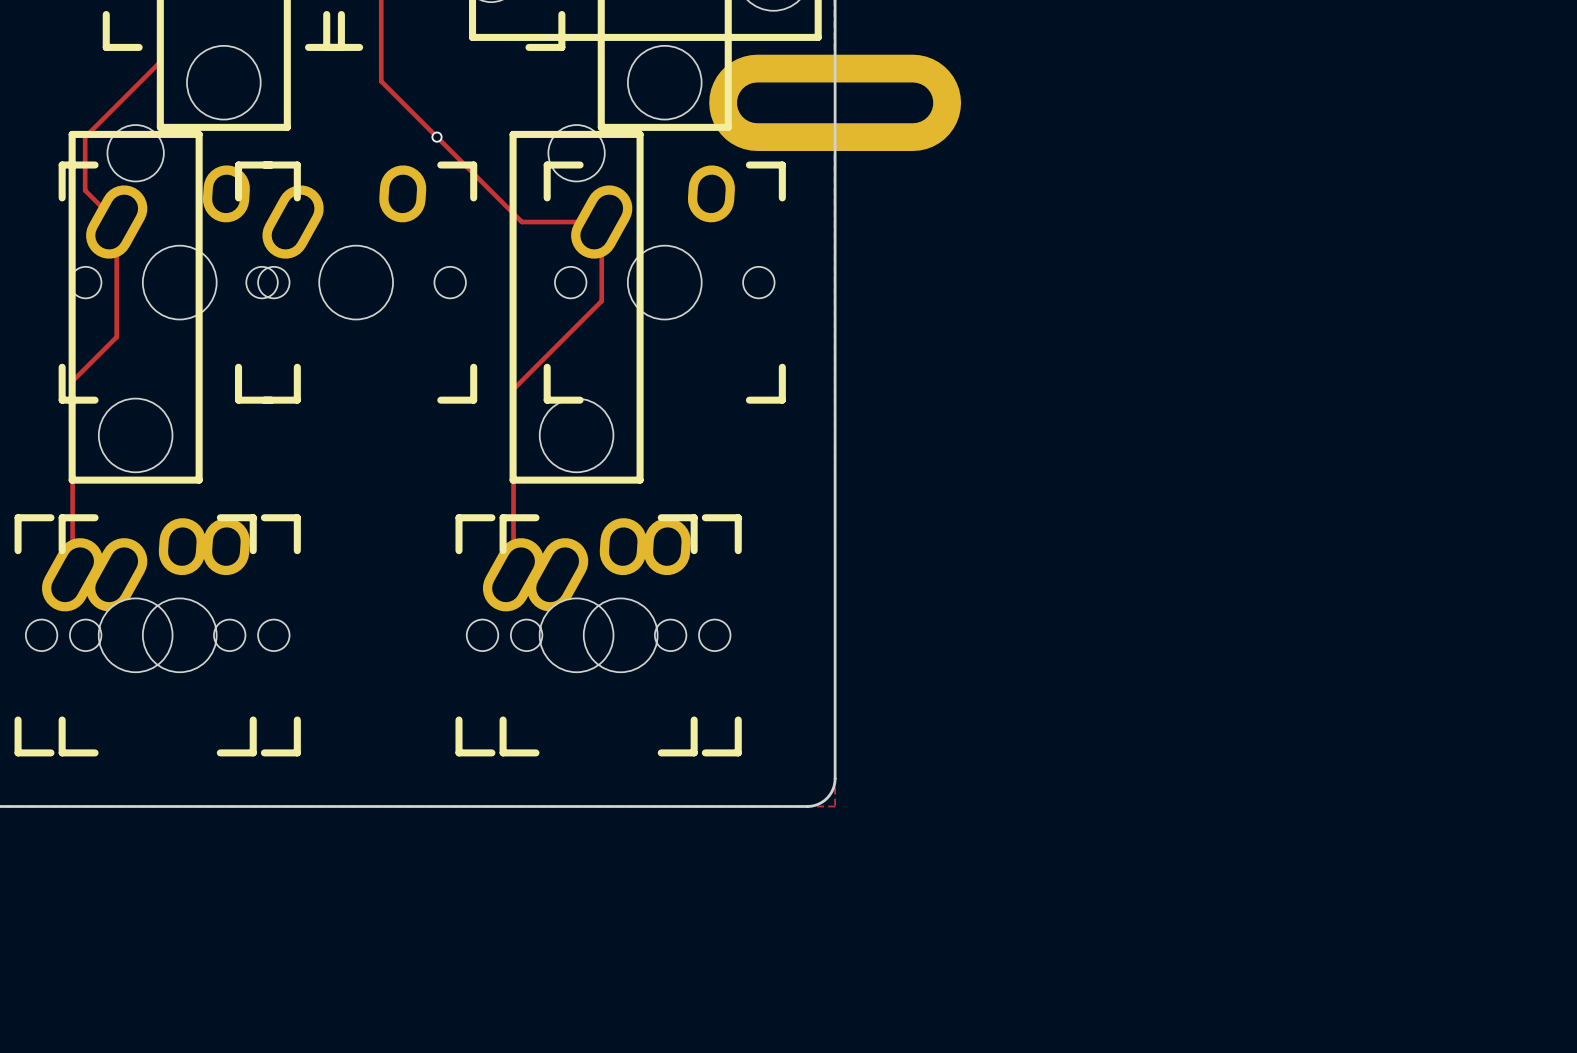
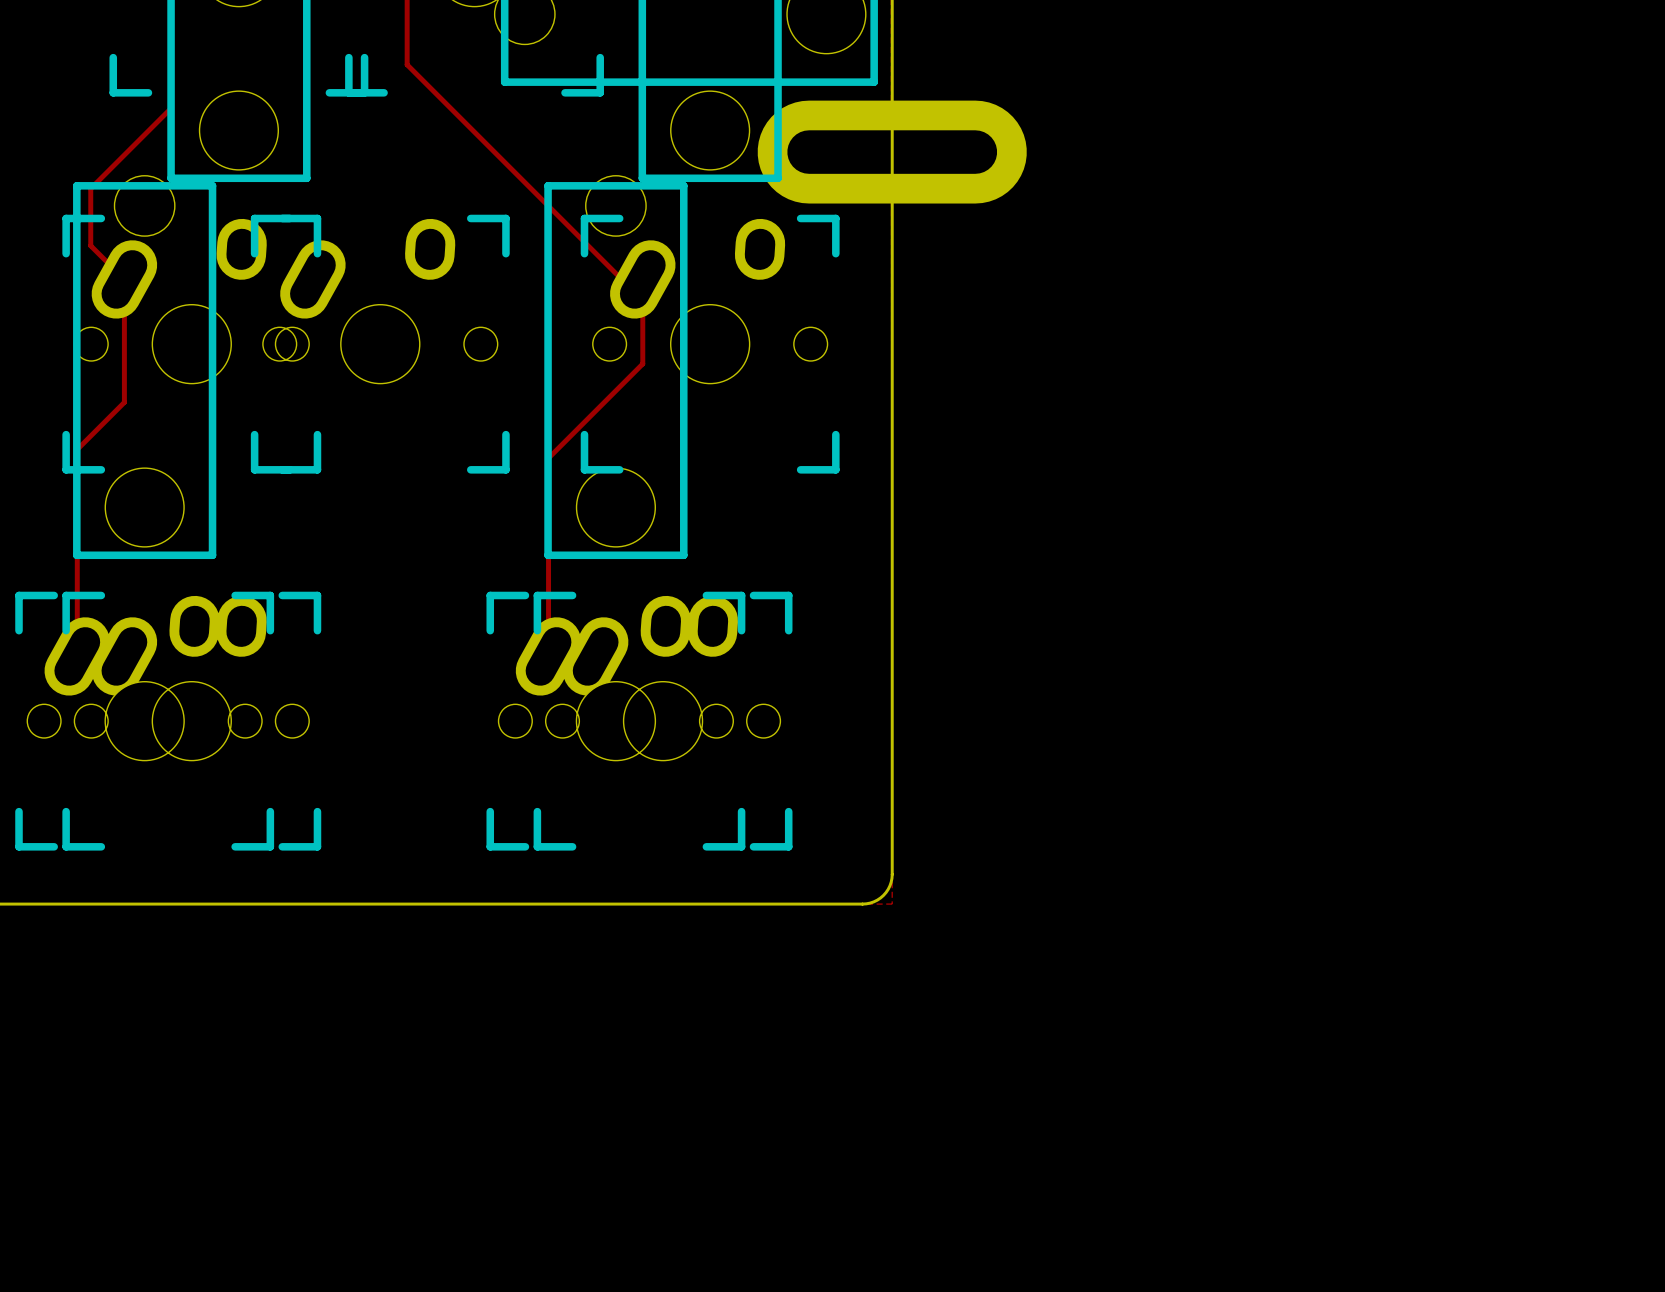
track: (381, 21) (381, 81) (521, 222) (582, 222) -> (407, 64) (621, 279)
via: (437, 137) -> none

